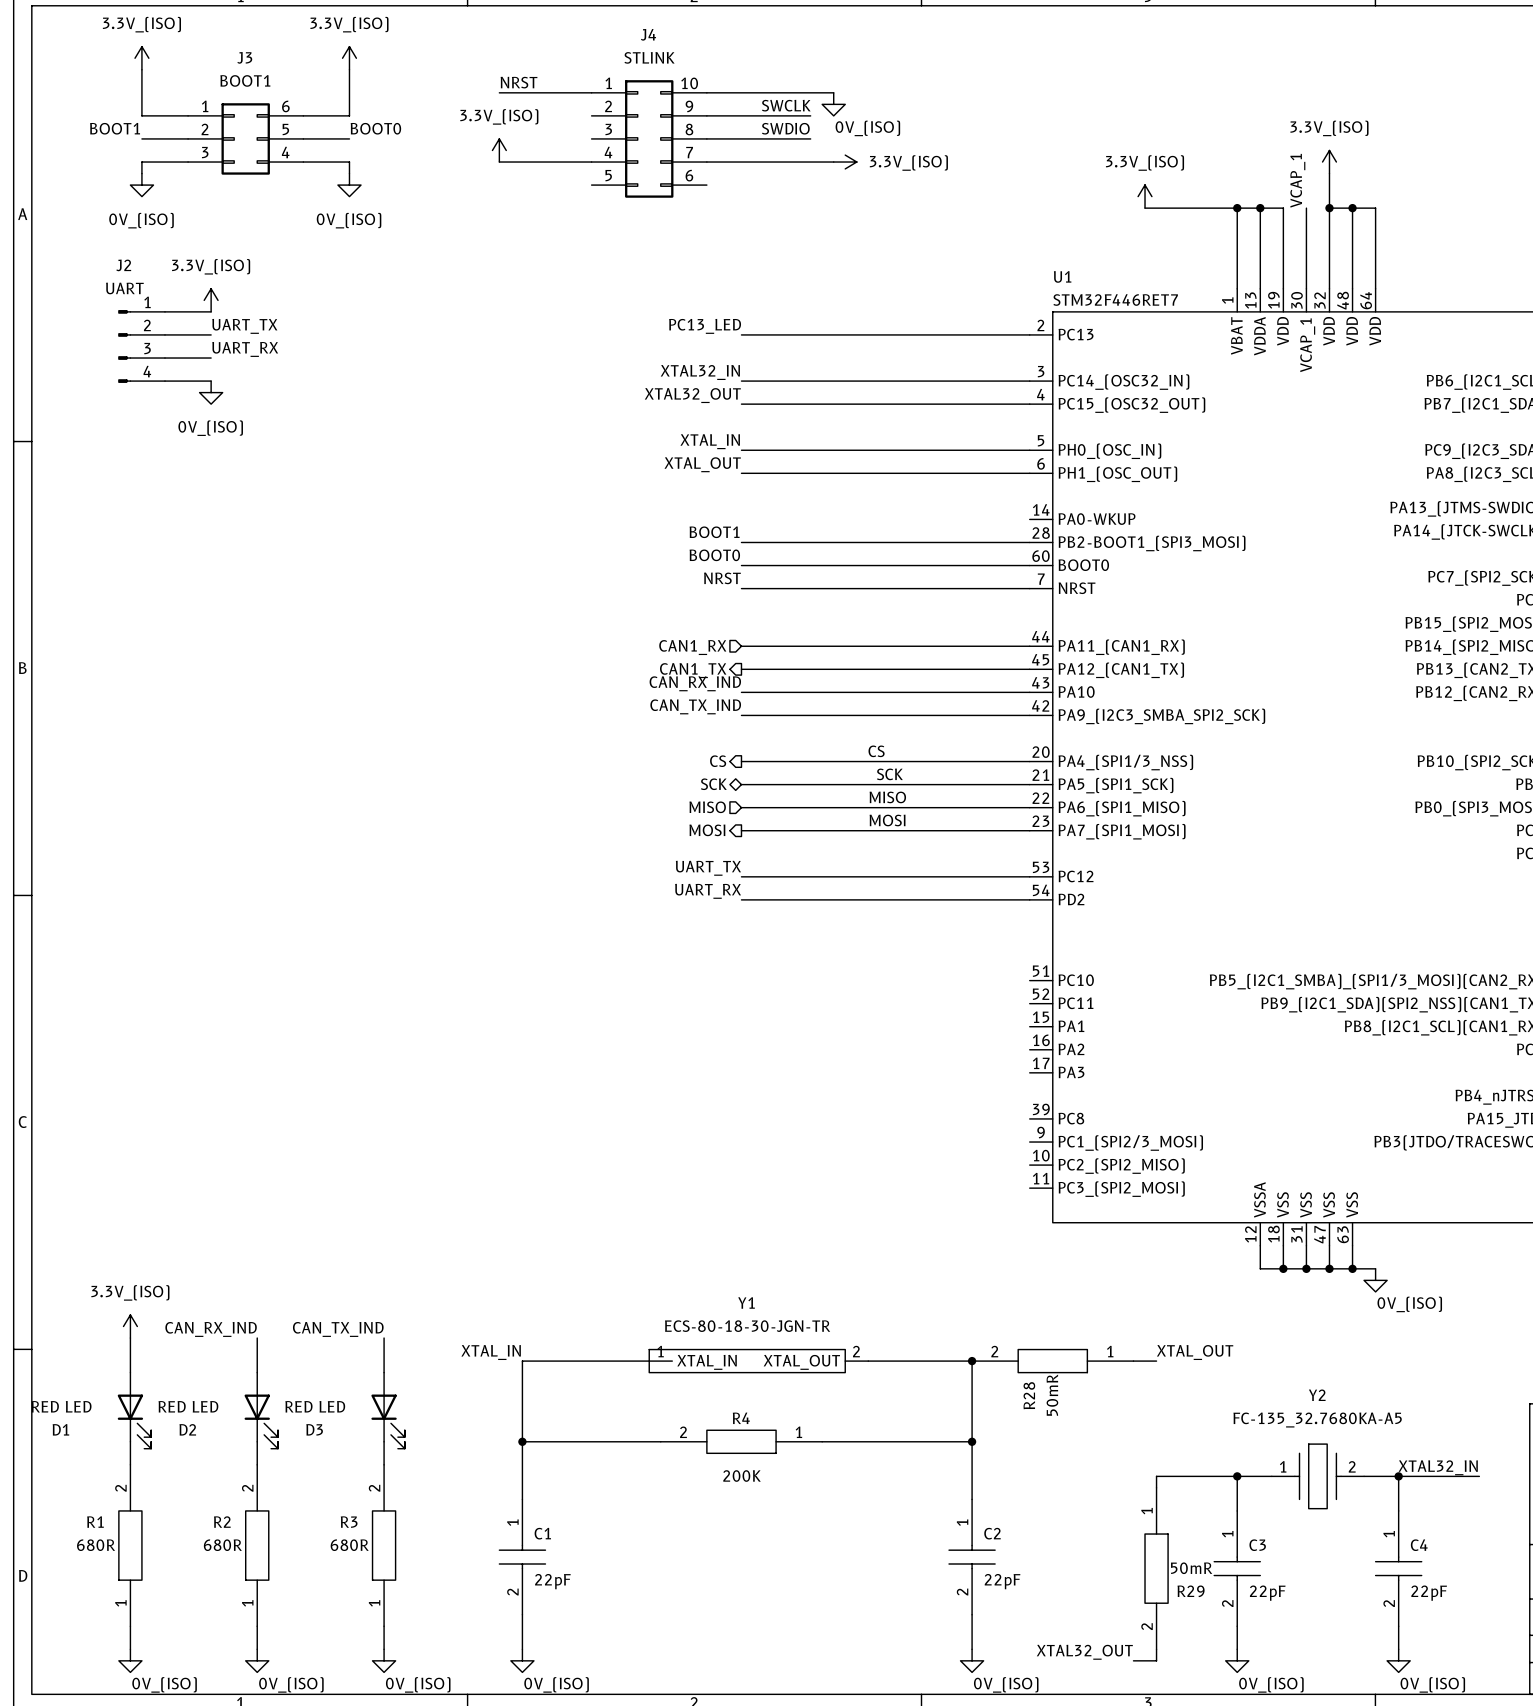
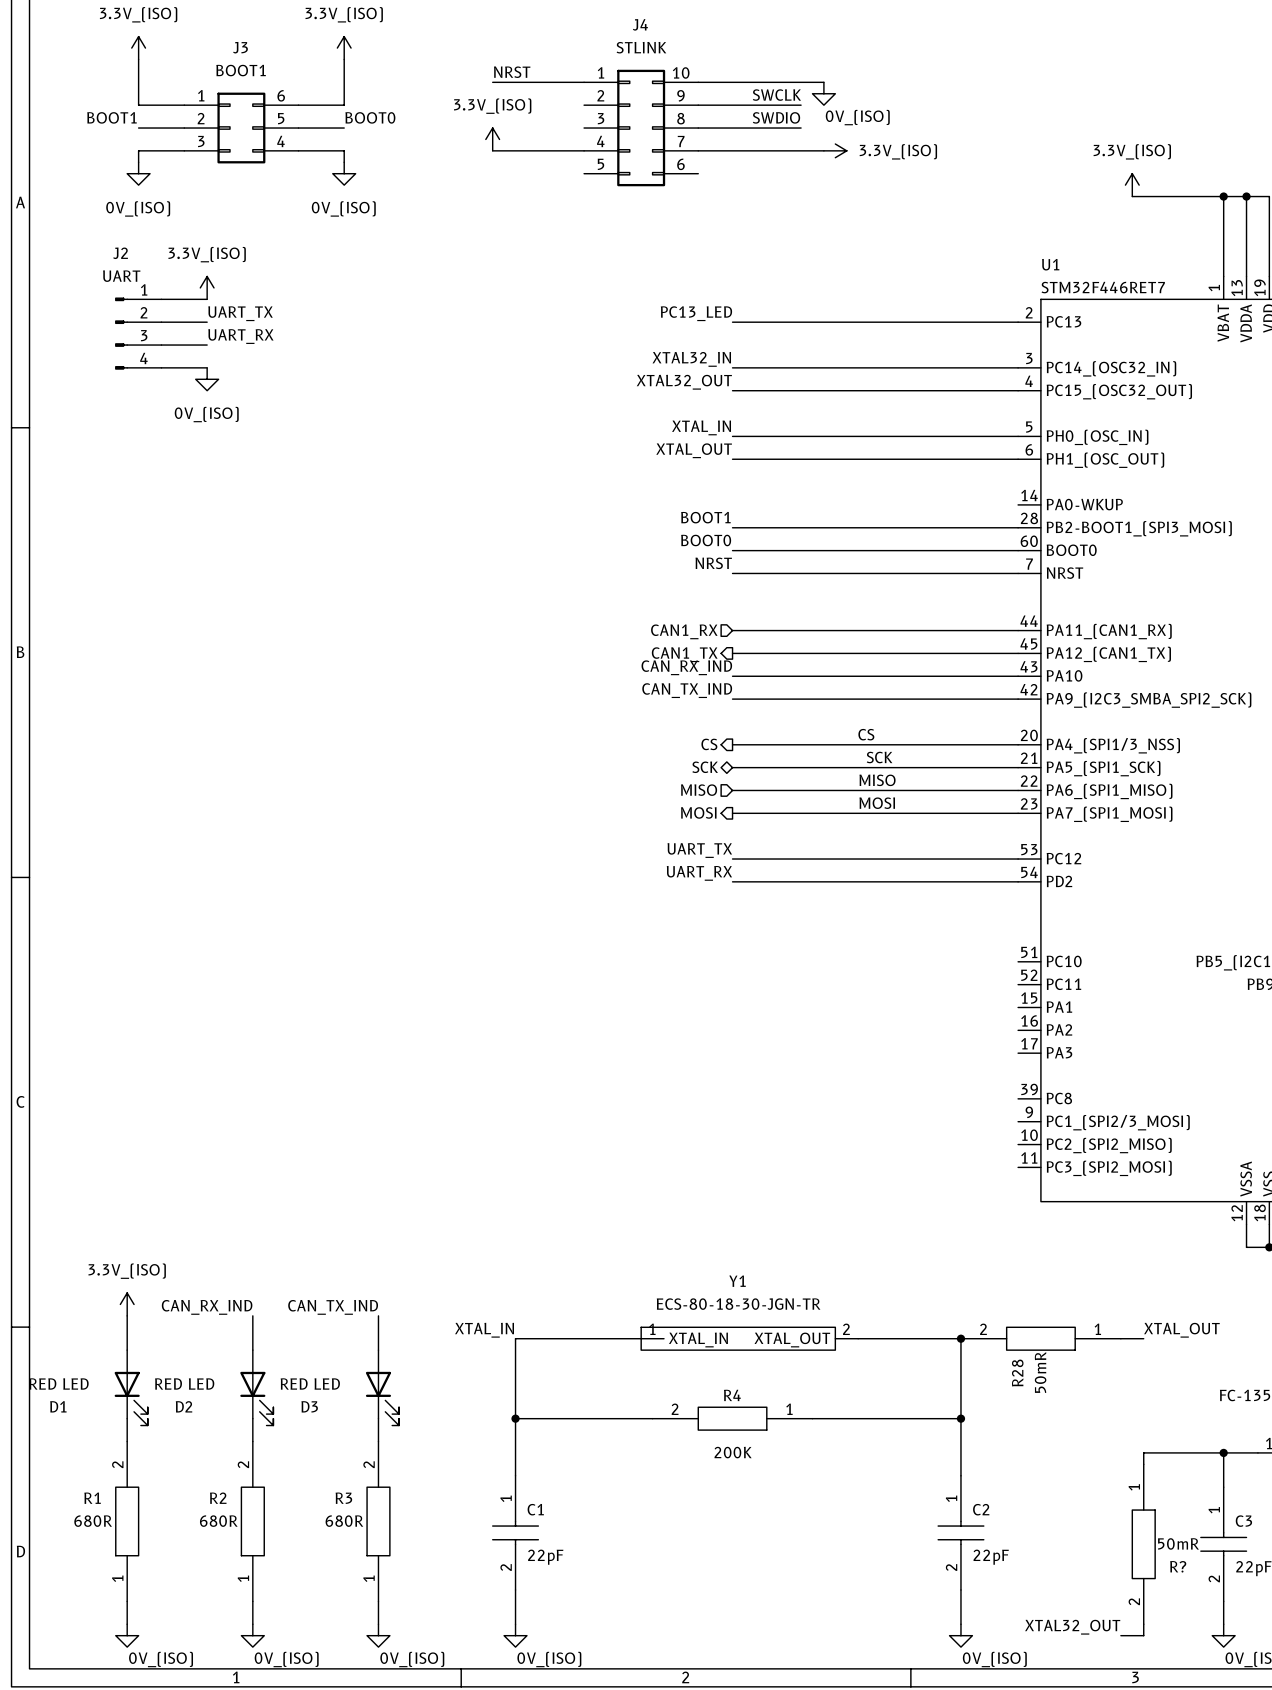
R29 name: R29 (1191, 1591) -> R? (1178, 1566)

